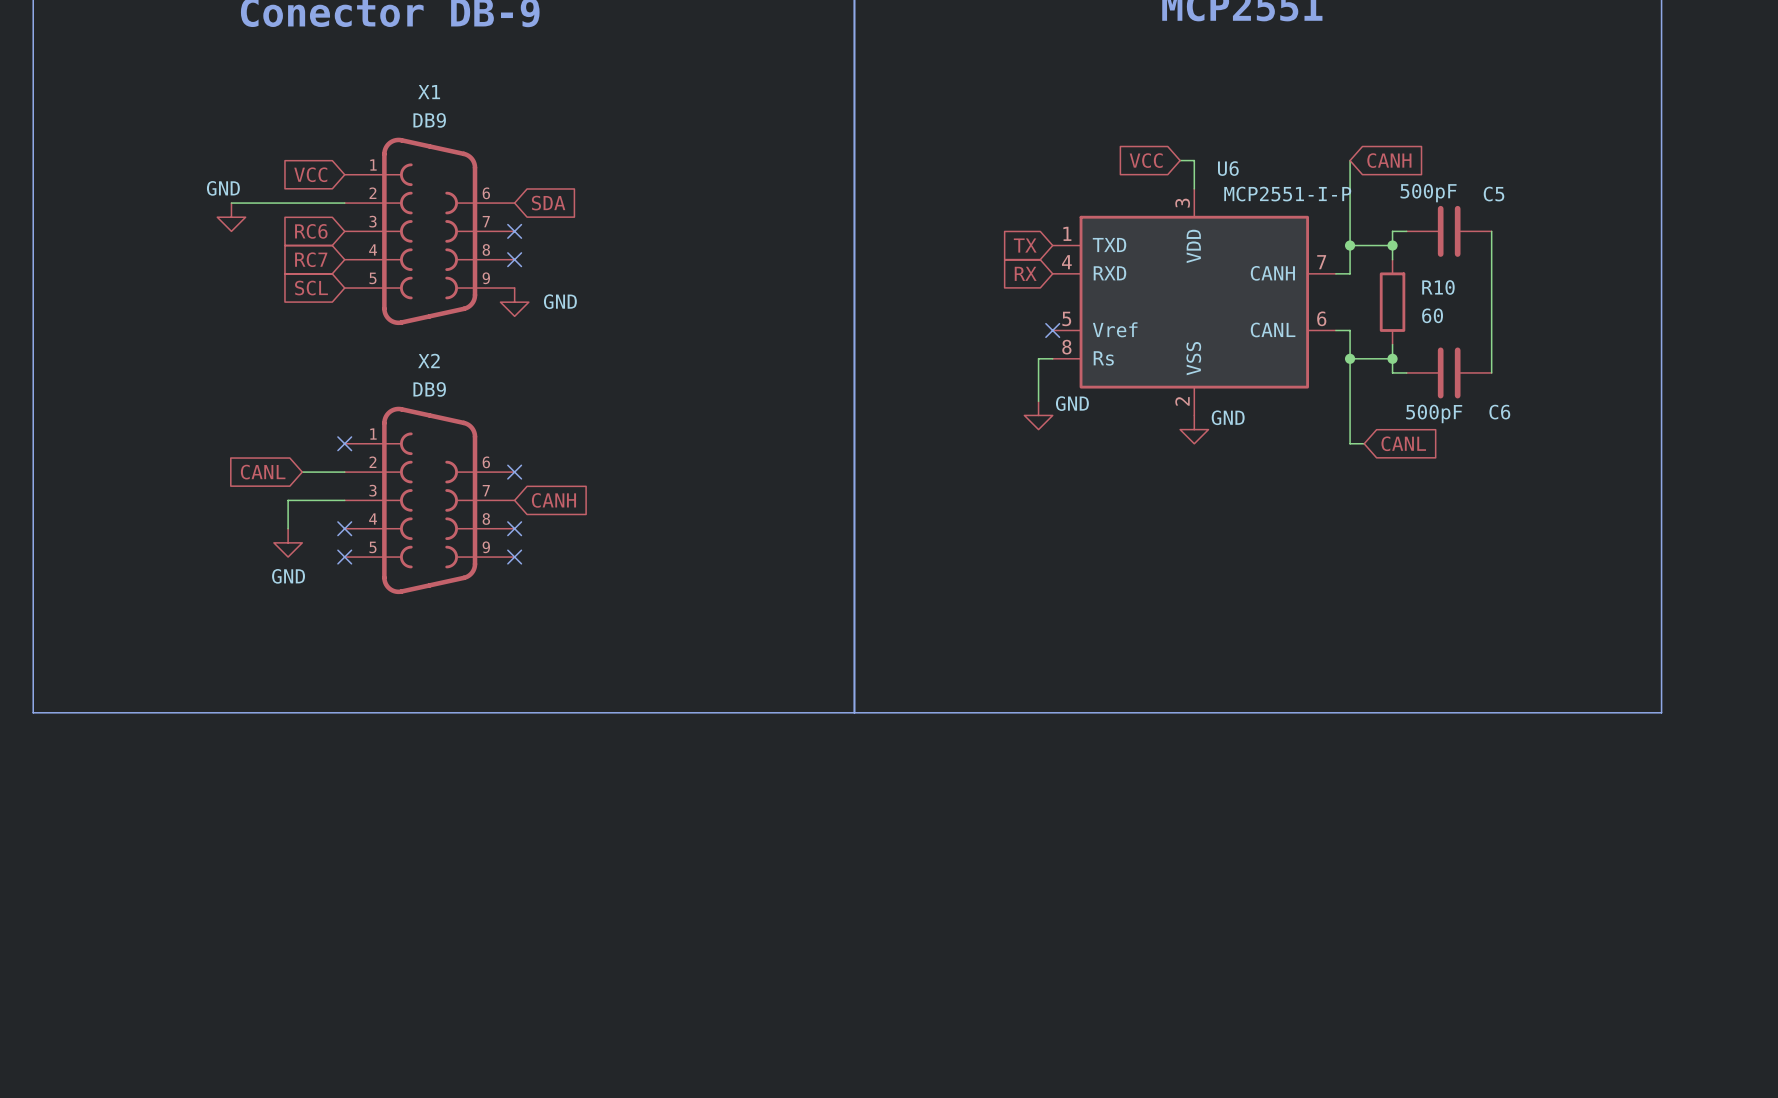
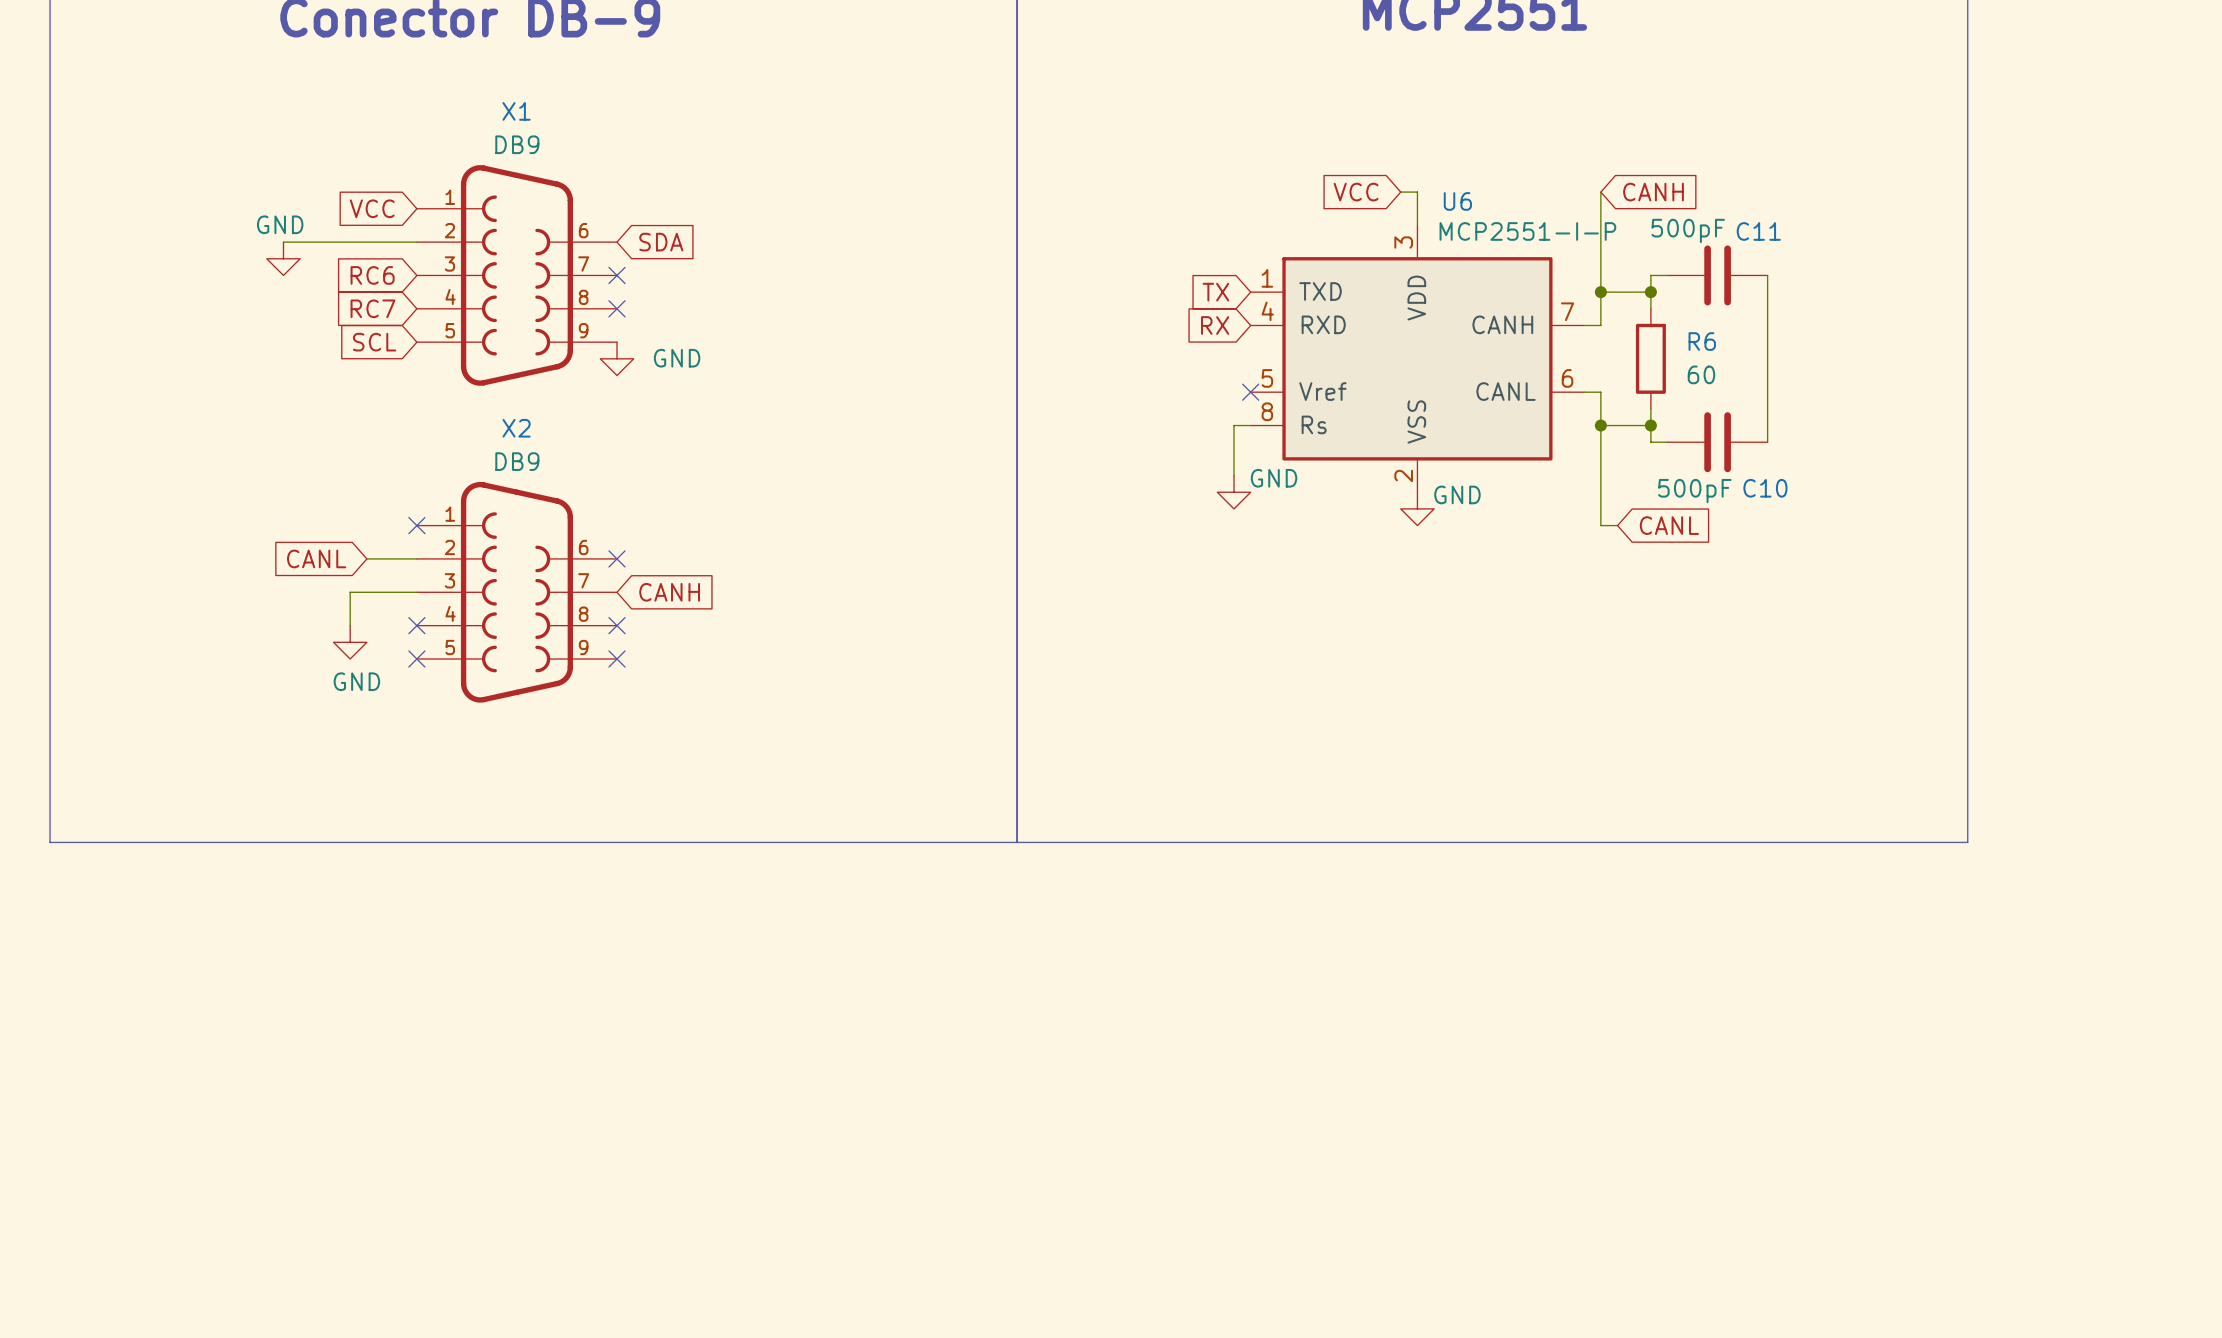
C5 name: C5 (1494, 194) -> C11 (1758, 231)
R10 name: R10 (1438, 287) -> R6 (1702, 341)
C6 name: C6 (1499, 412) -> C10 (1765, 488)

